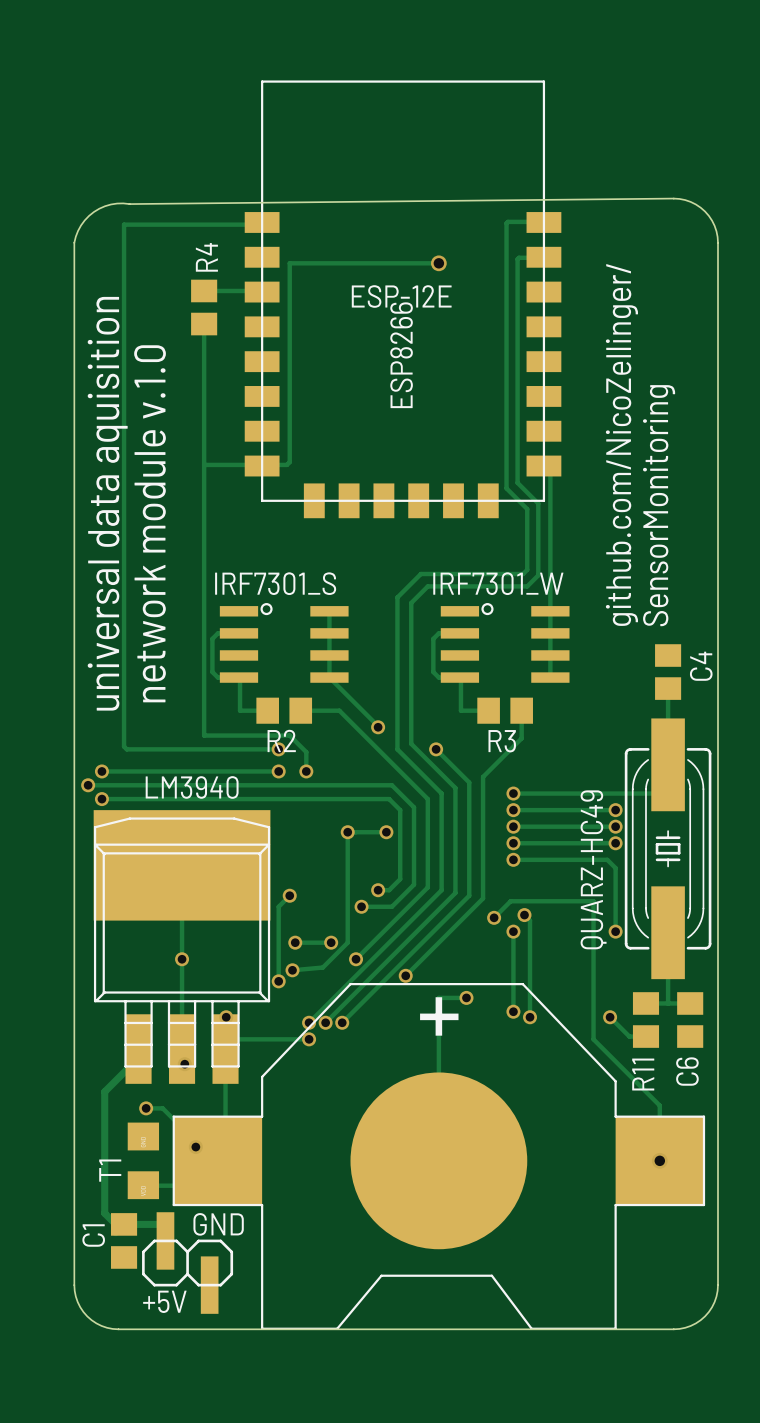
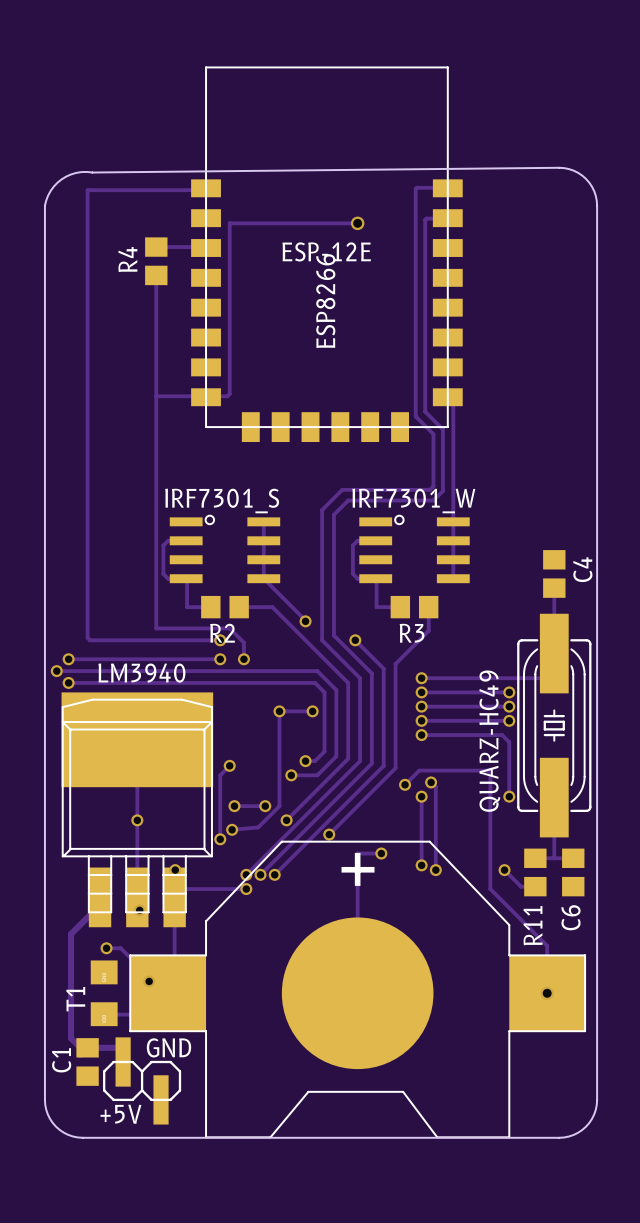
R4 name position: R4 (206, 257) -> R4 (127, 259)
text: github.com/NicoZellinger/ (621, 444) -> none
text: universal data aquisition (107, 503) -> none
text: SensorMonitoring (659, 505) -> none
text: network module v.1.0 (150, 523) -> none

